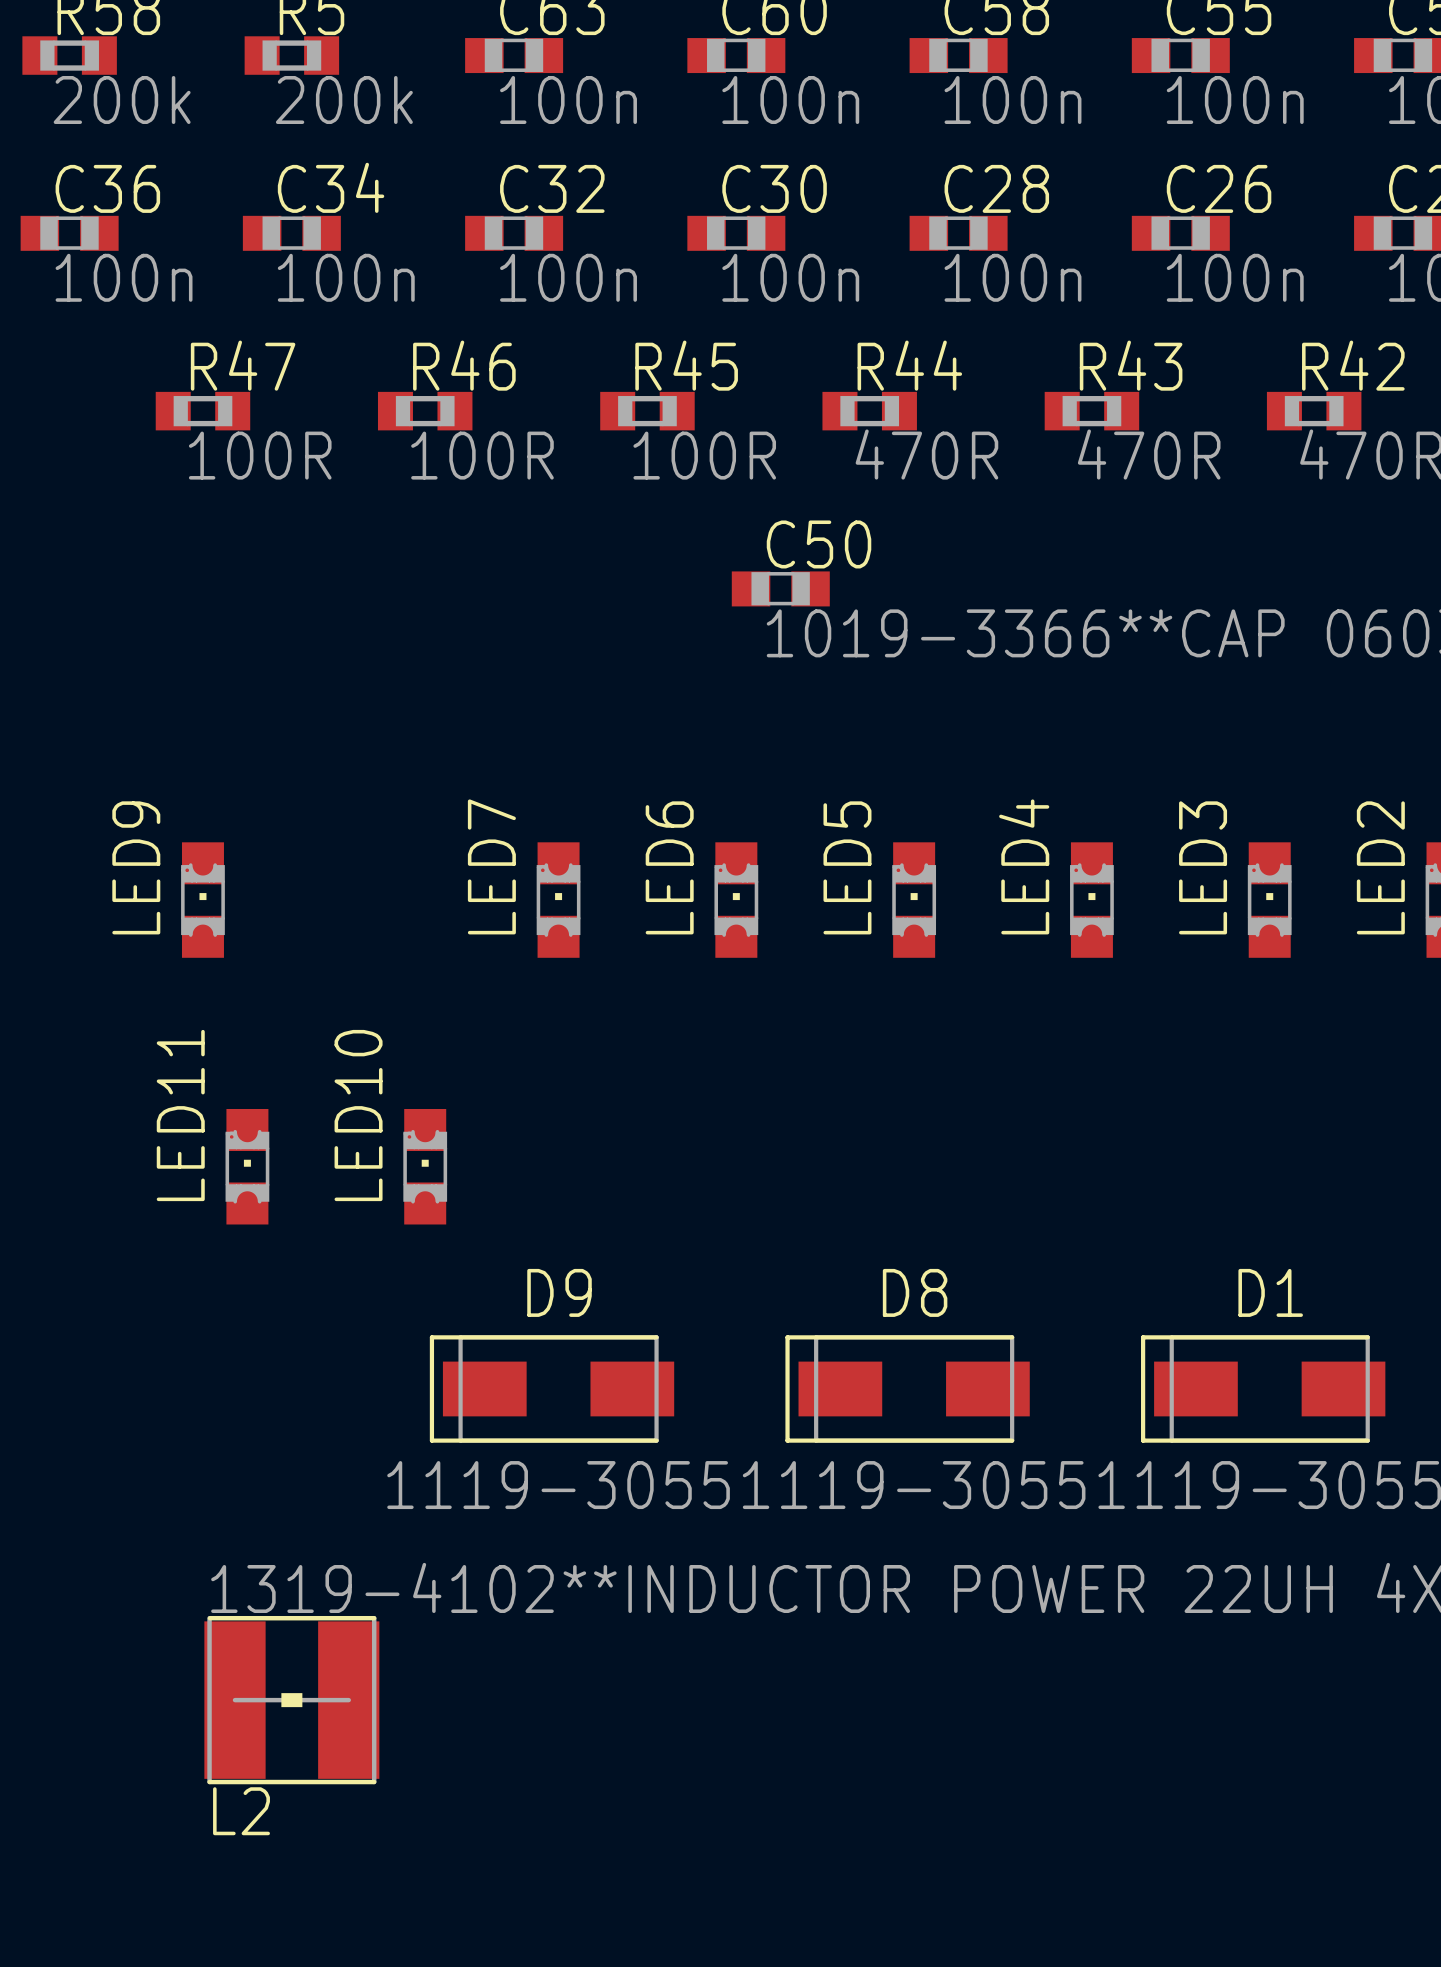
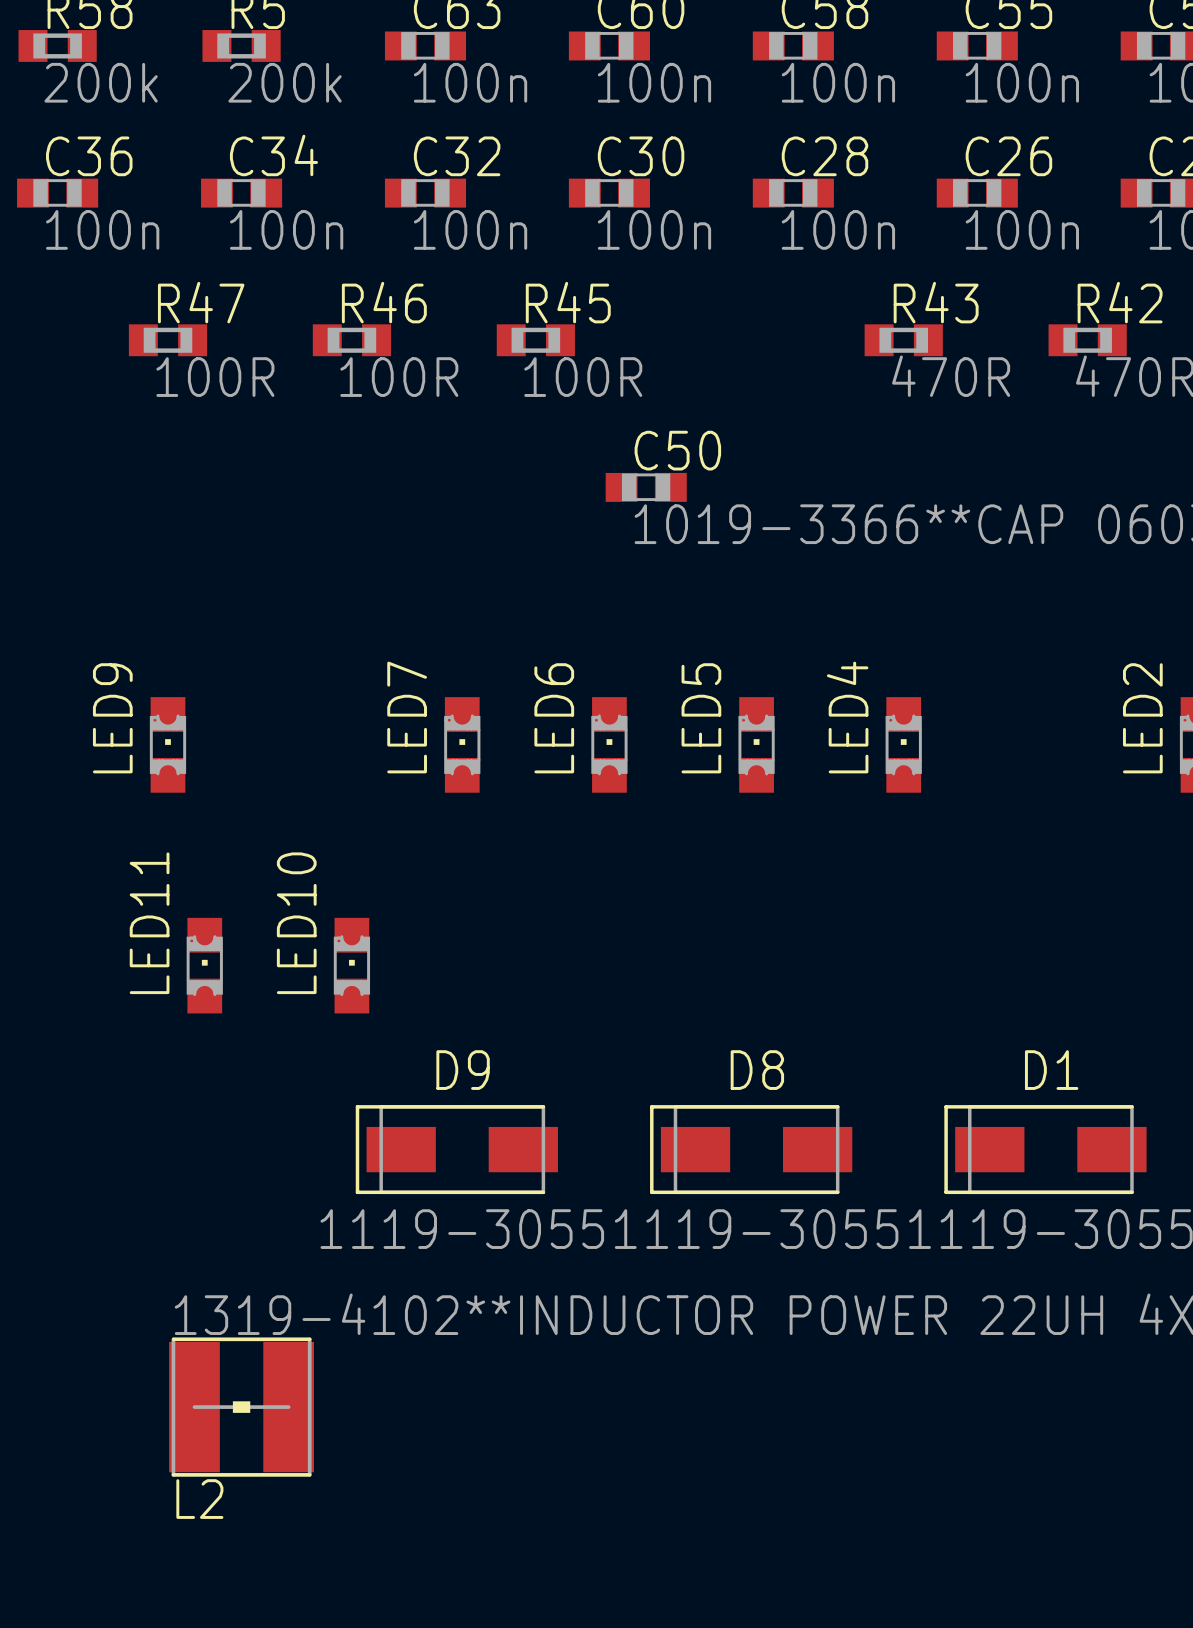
R44: 470R (869, 411) -> none
LED3: (1269, 900) -> none

